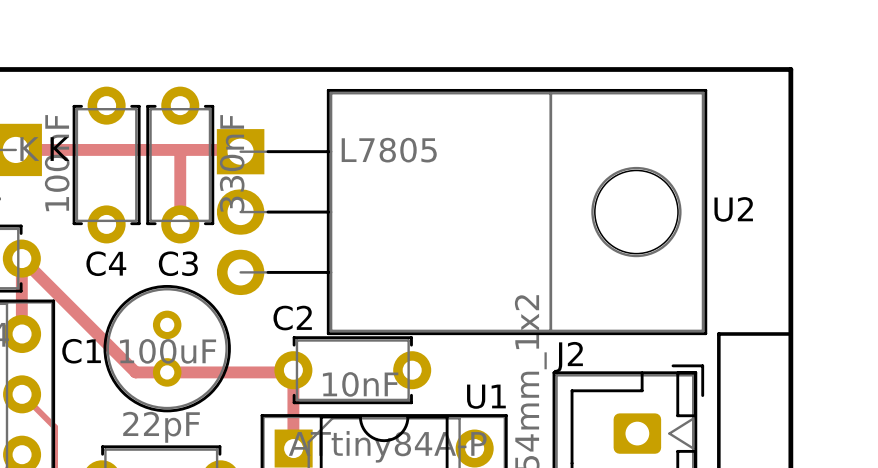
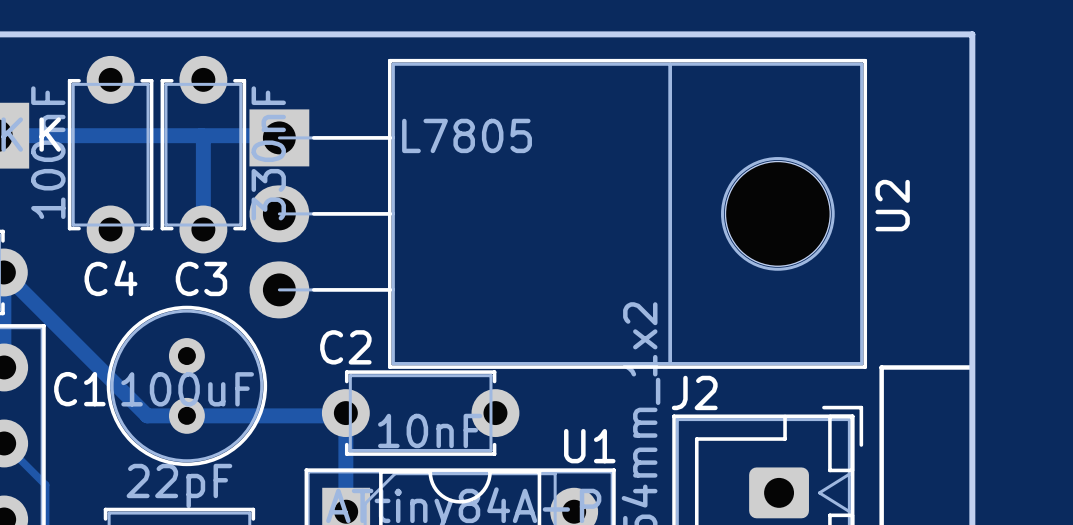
U2 name rotation: 0° (733, 209) -> 90° counterclockwise (892, 205)

